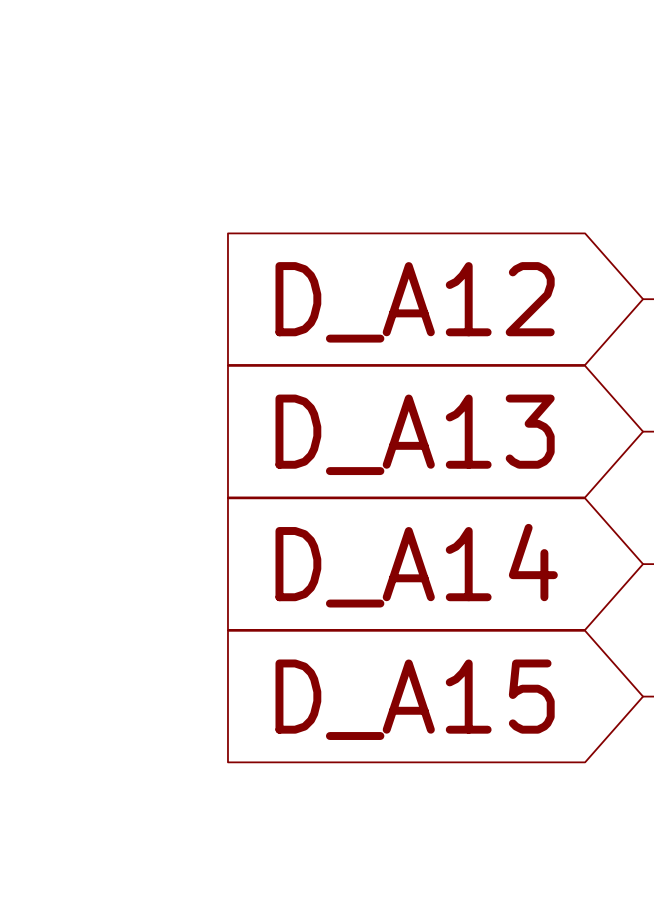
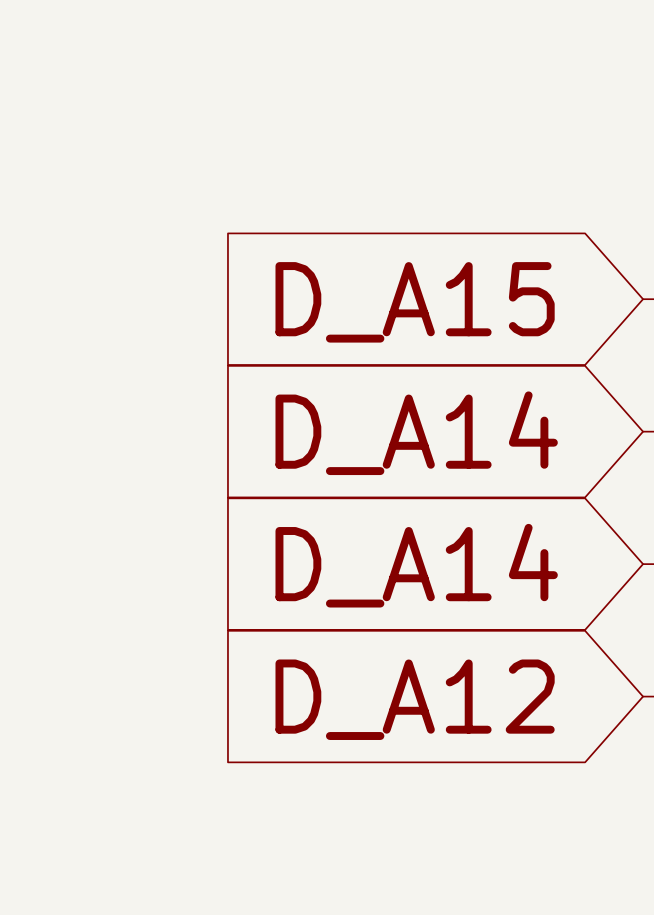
global label: D_A12 (415, 302) -> D_A15 (415, 302)
global label: D_A13 (415, 434) -> D_A14 (416, 433)
global label: D_A15 (415, 699) -> D_A12 (415, 699)

